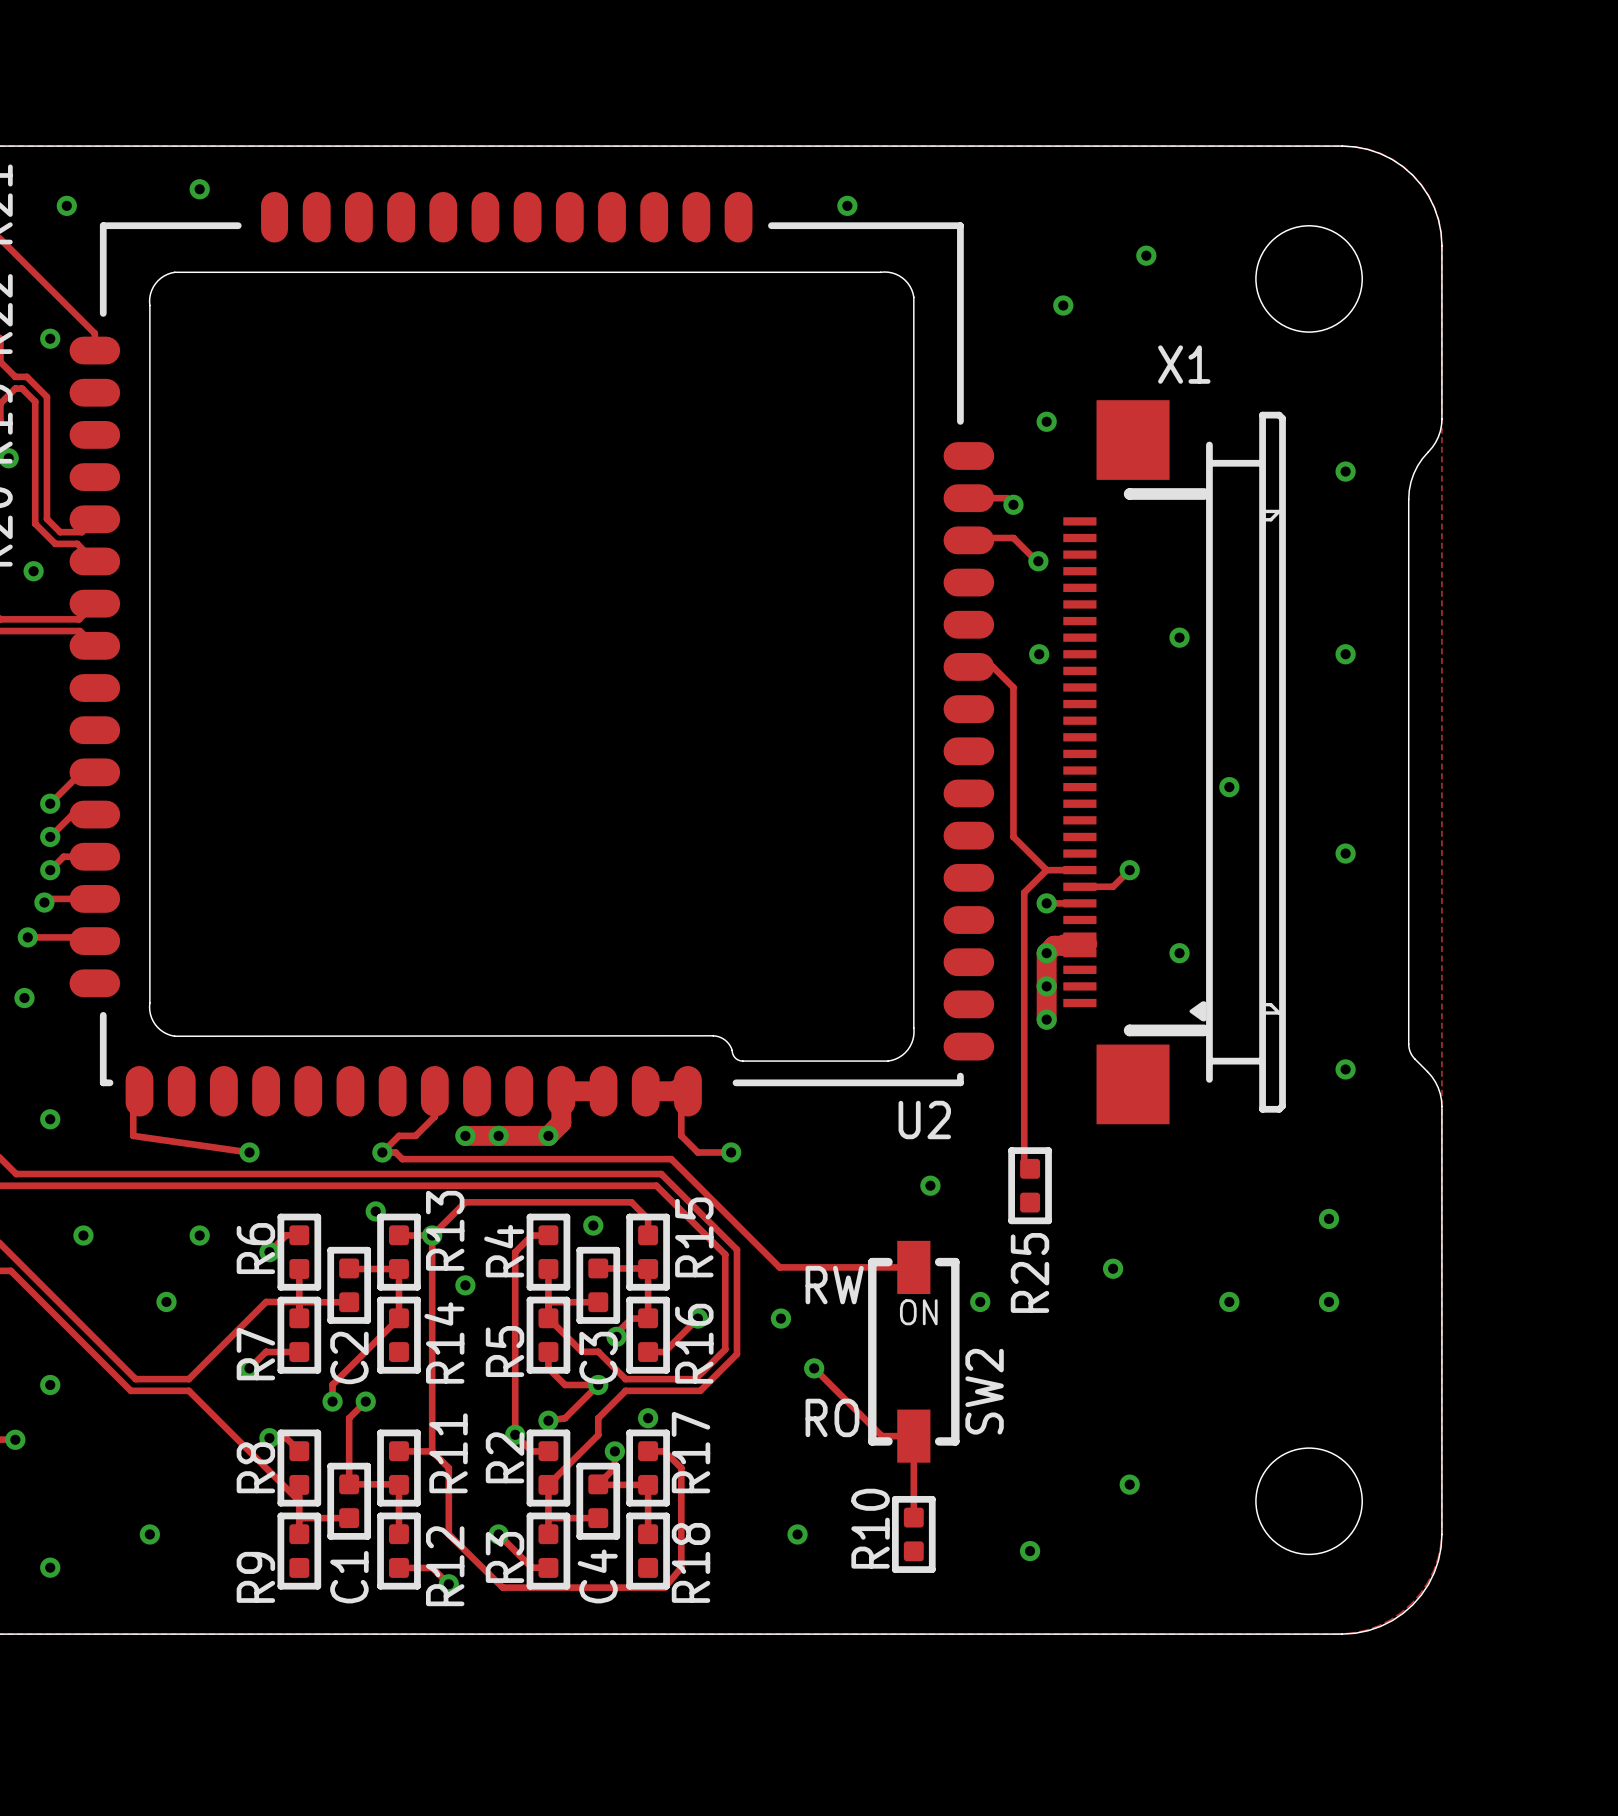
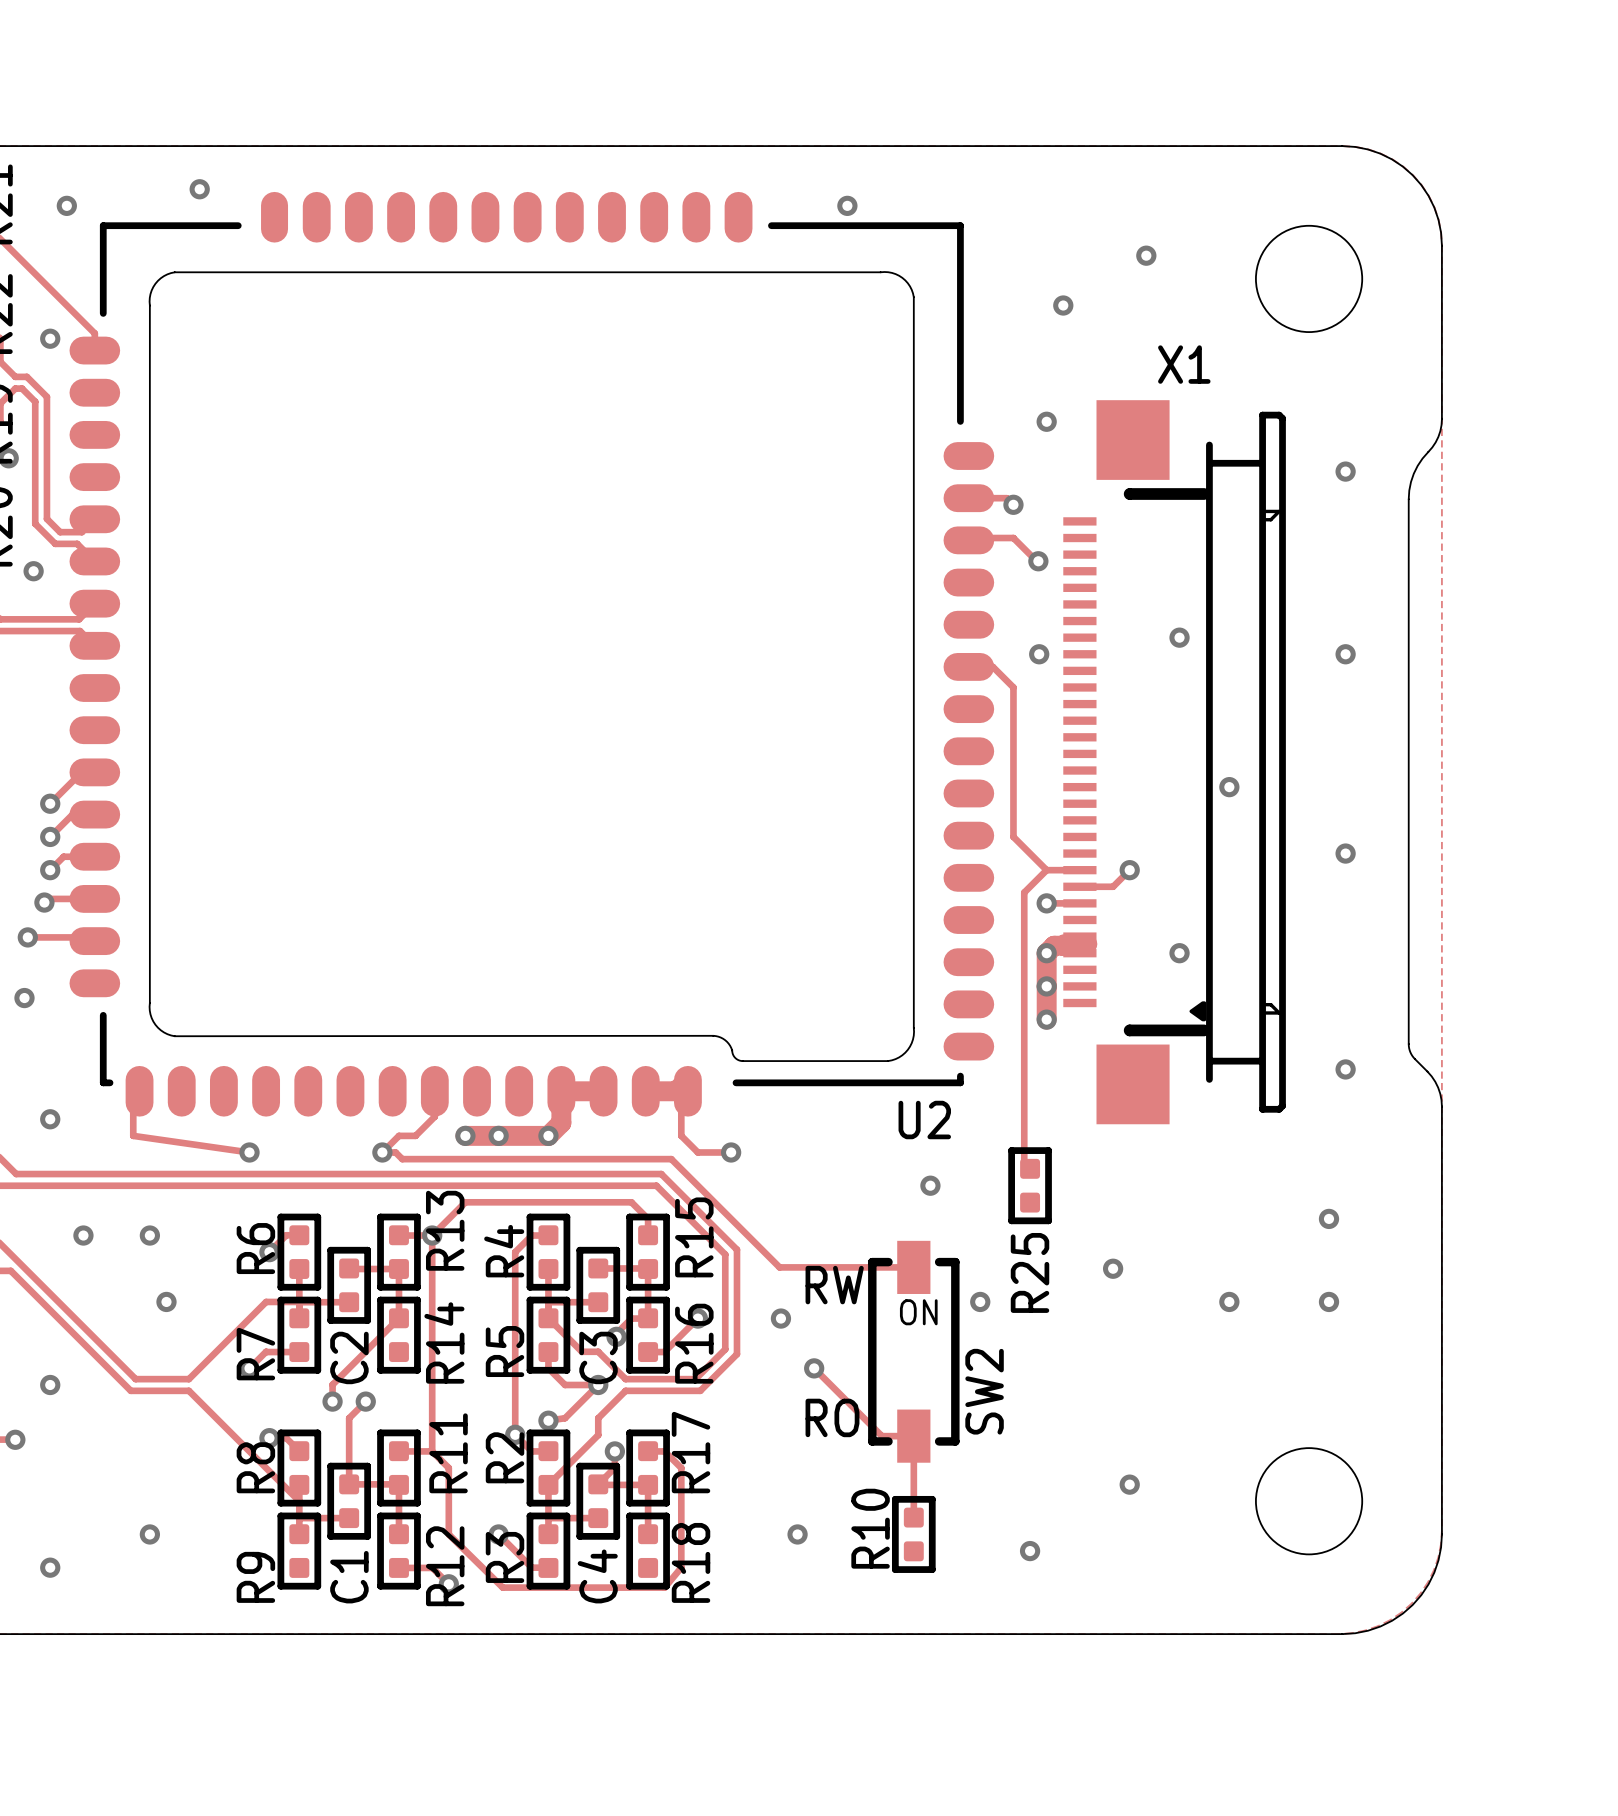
via: (375, 1211) -> none
via: (593, 1225) -> none
via position: (199, 1235) -> (149, 1235)
via: (465, 1285) -> none
via: (648, 1418) -> none

